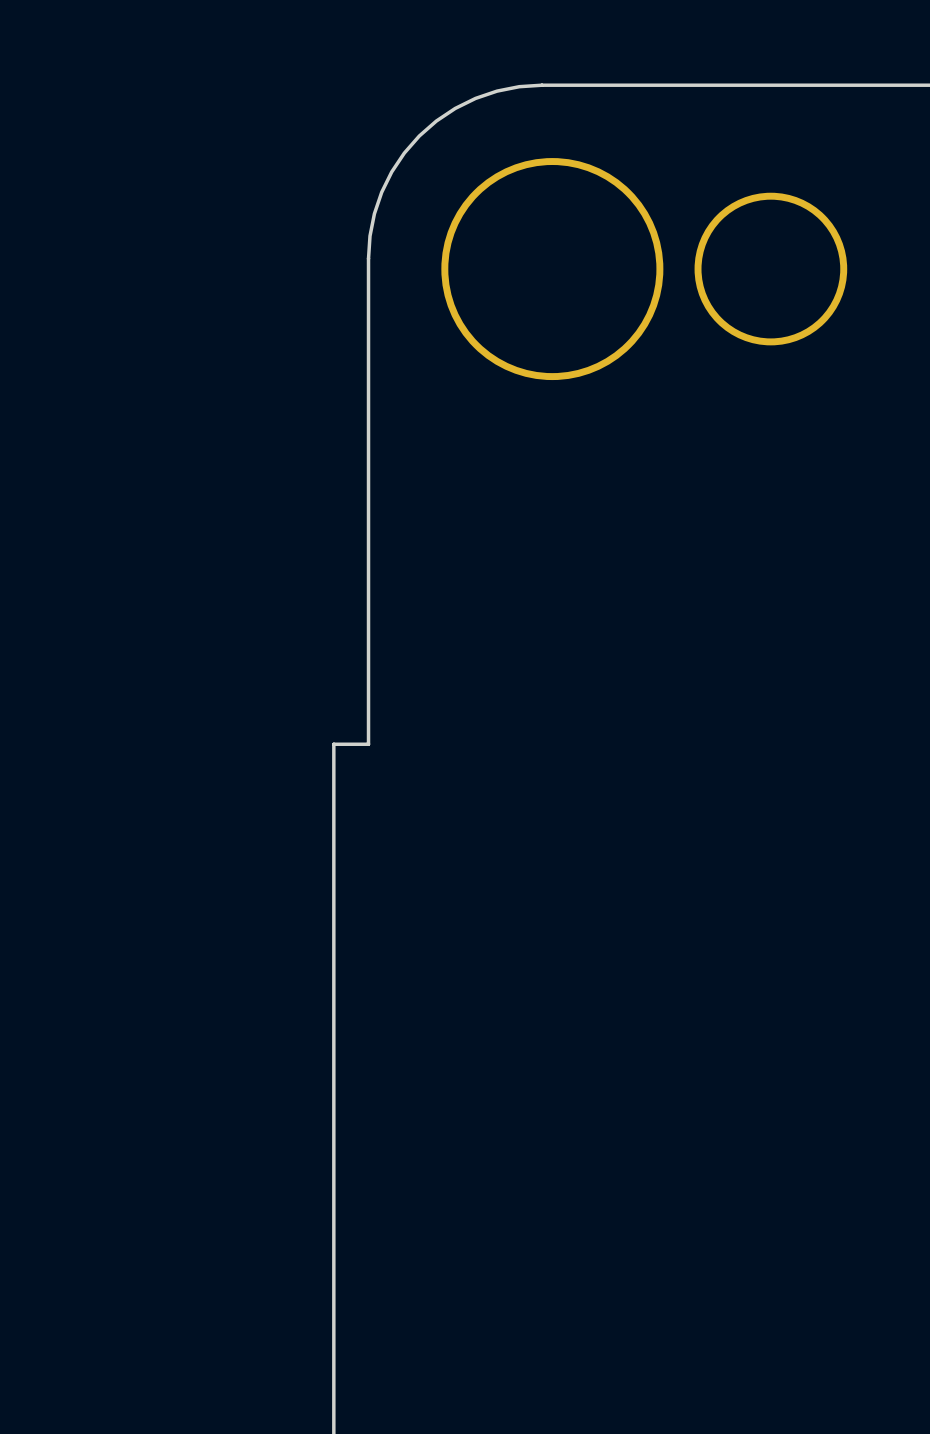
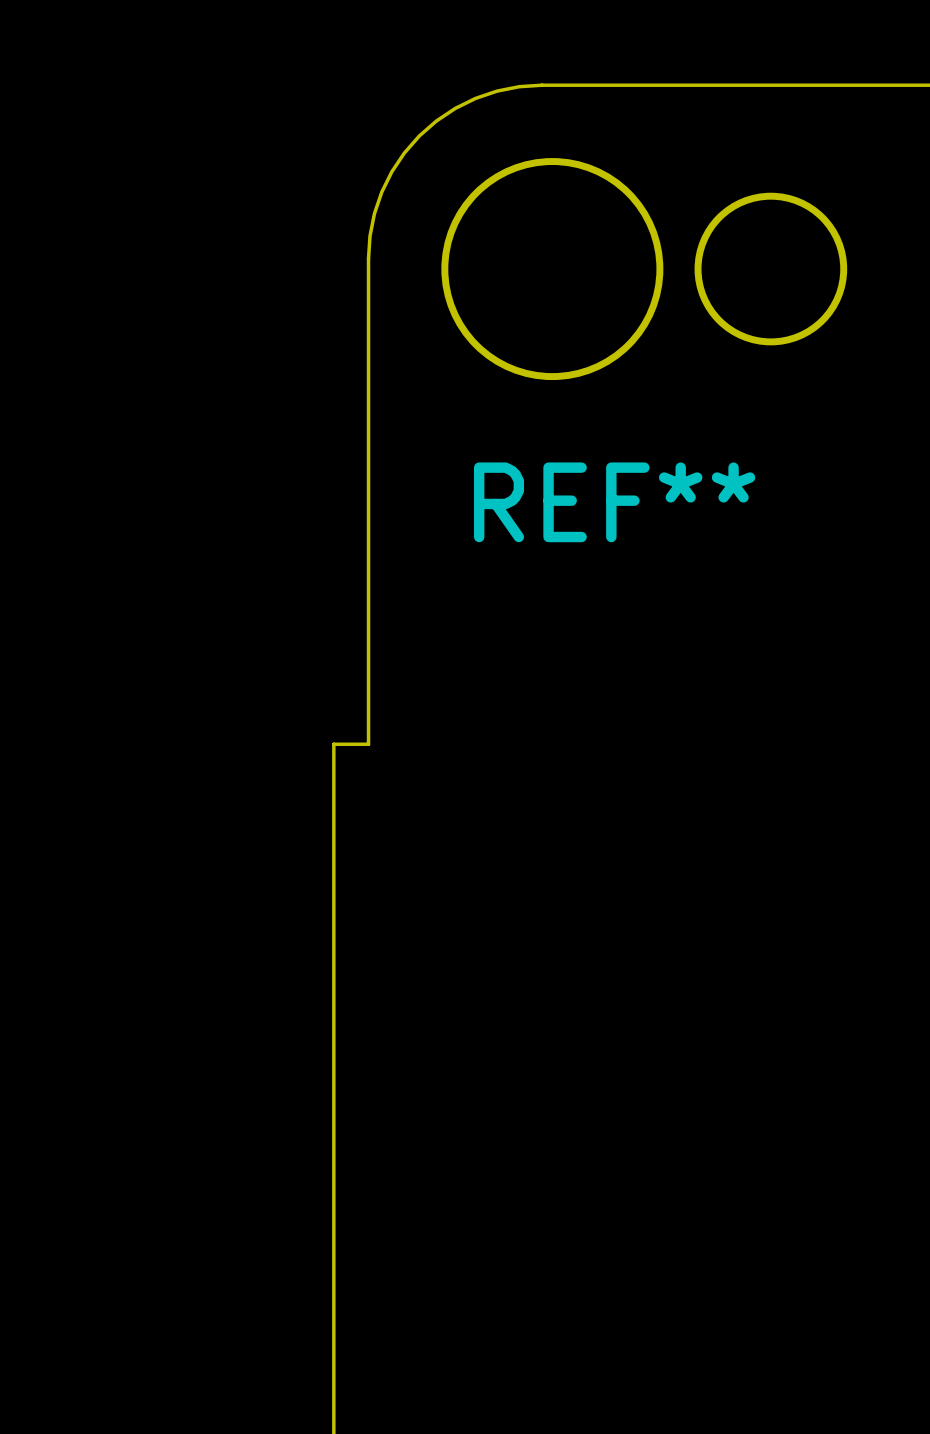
REF** name: none -> REF** (614, 502)

